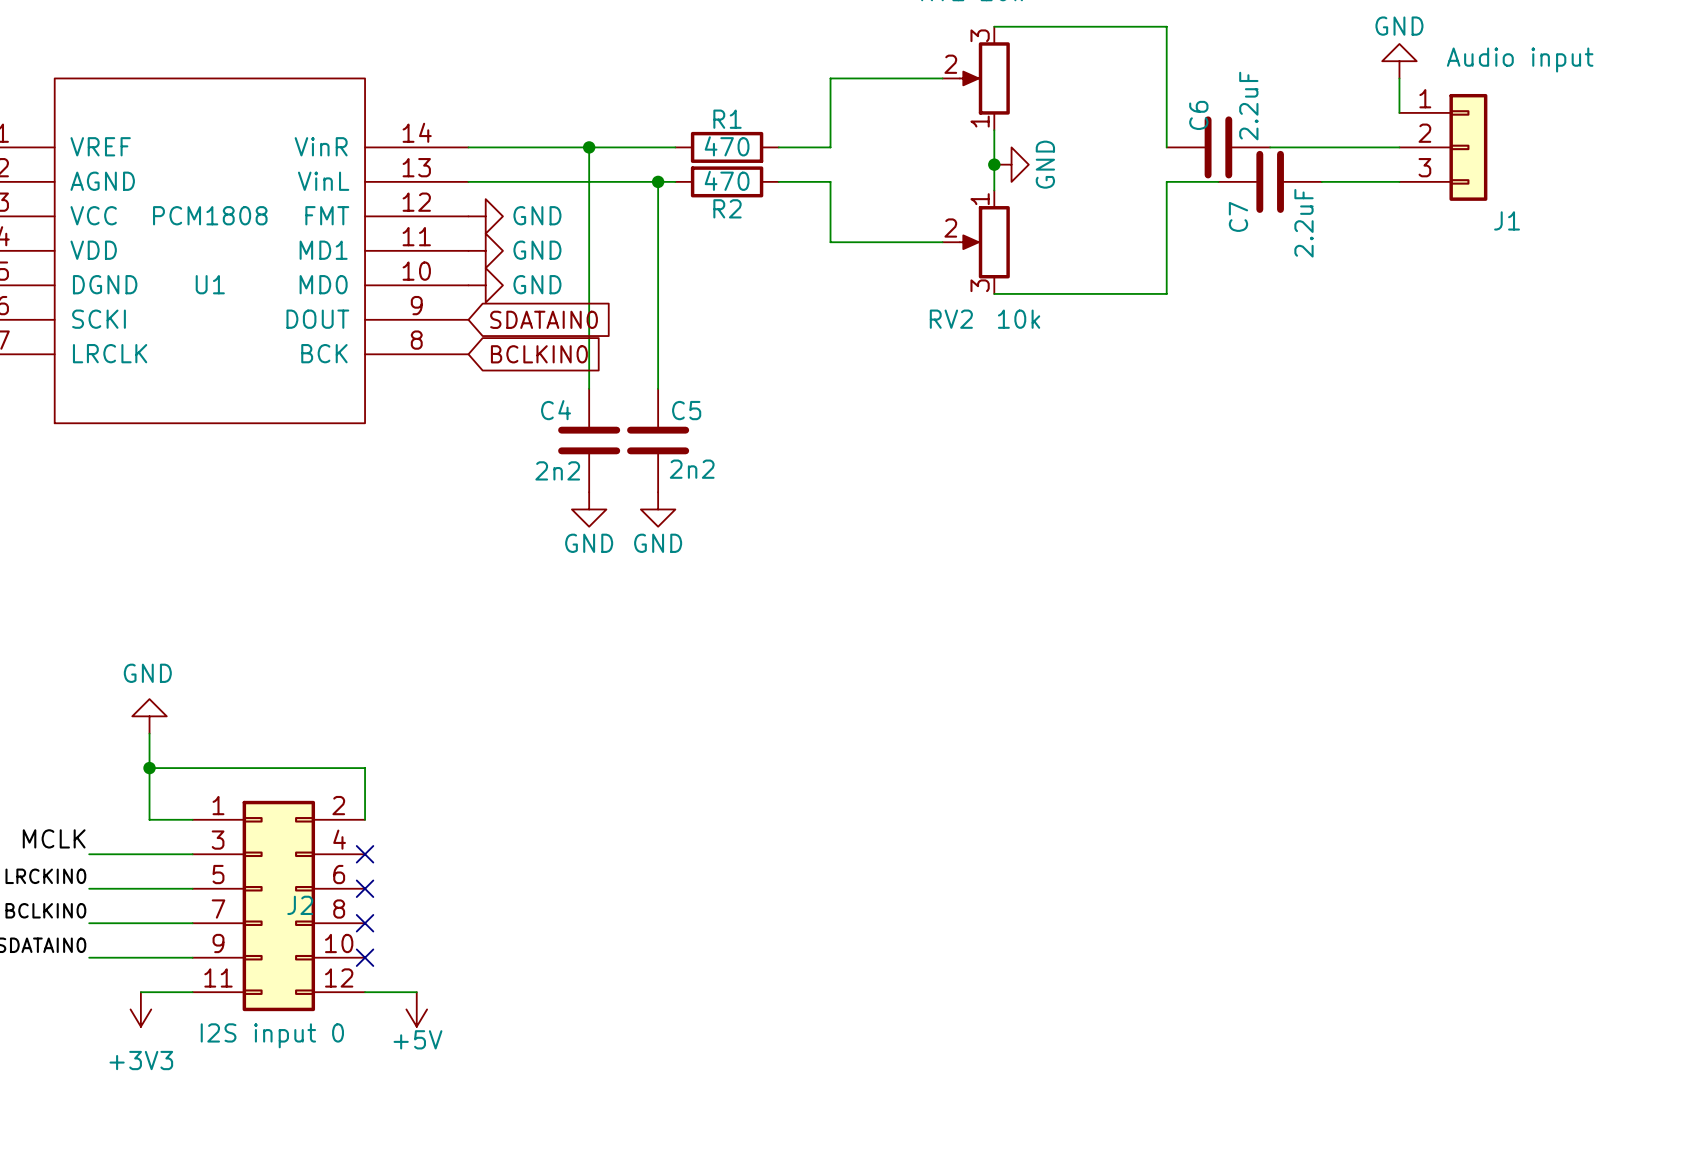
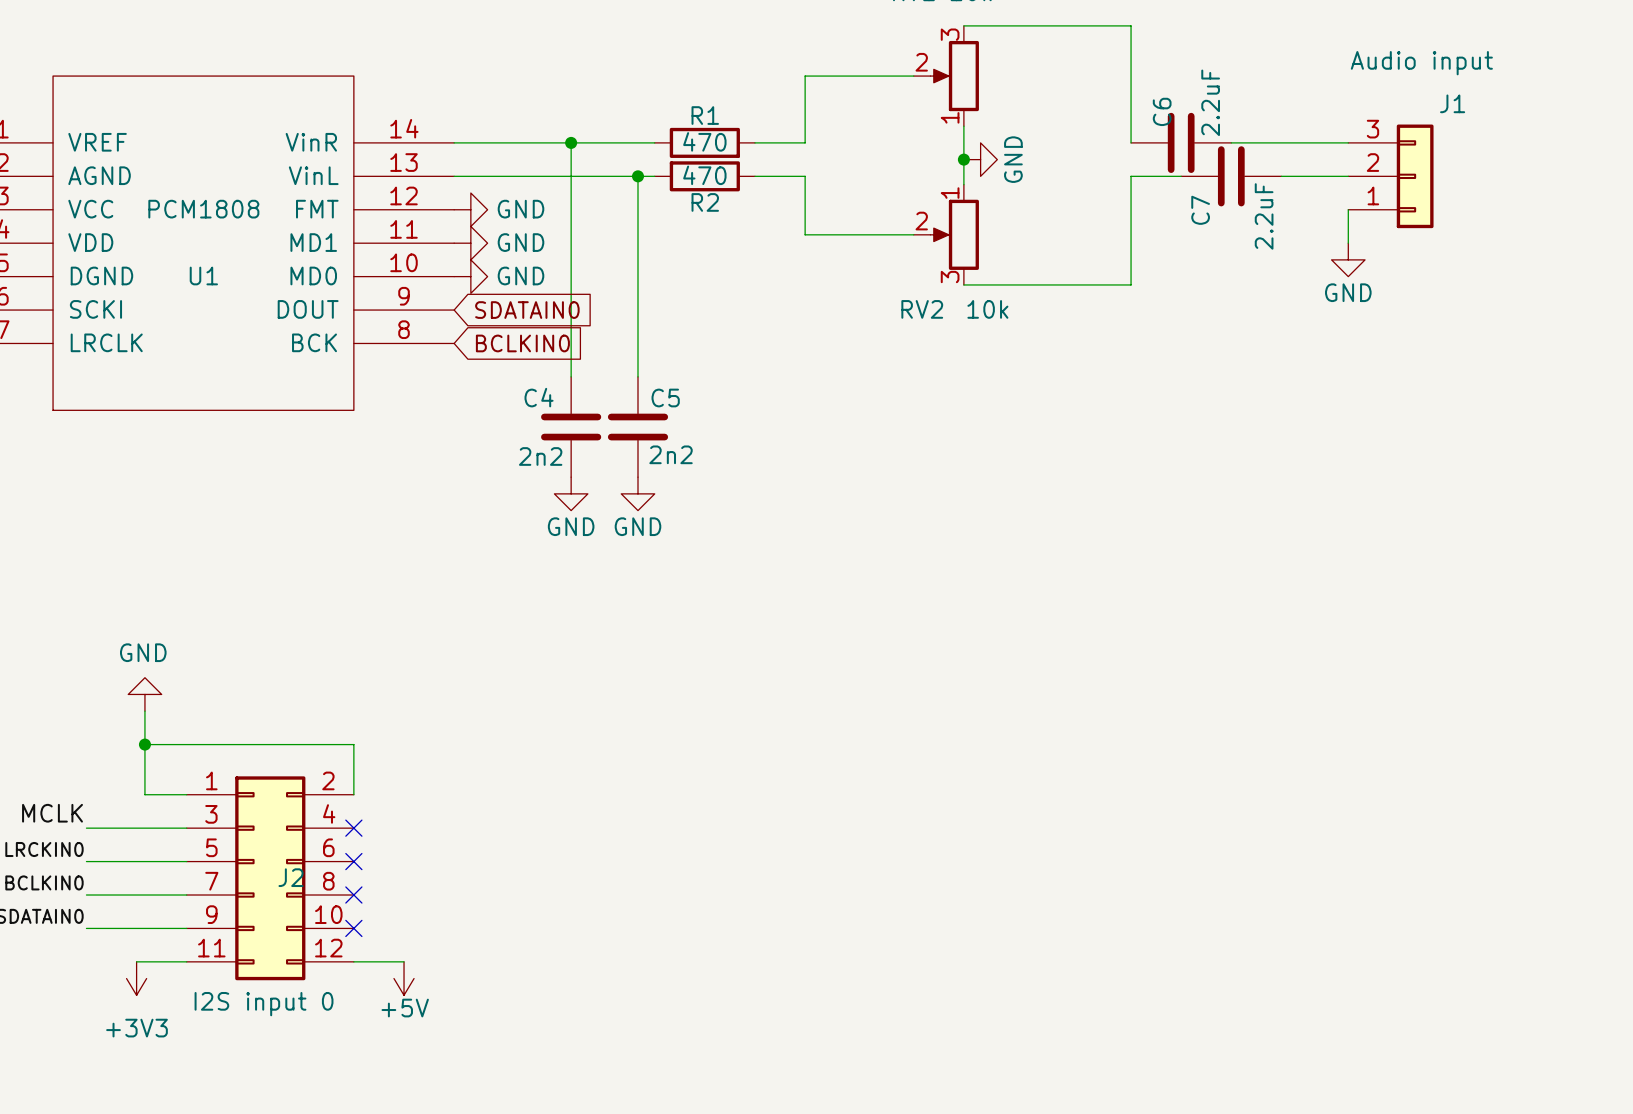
J1 text position: Audio input (1520, 59) -> Audio input (1421, 63)
power symbol rotation: 0° (1399, 61) -> 180° (1348, 259)
power symbol position: GND (1399, 61) -> GND (1348, 259)
wire: (1399, 78) (1399, 112) -> (1348, 209) (1348, 243)
J1 flip: as is (1468, 147) -> up-down (1415, 176)

